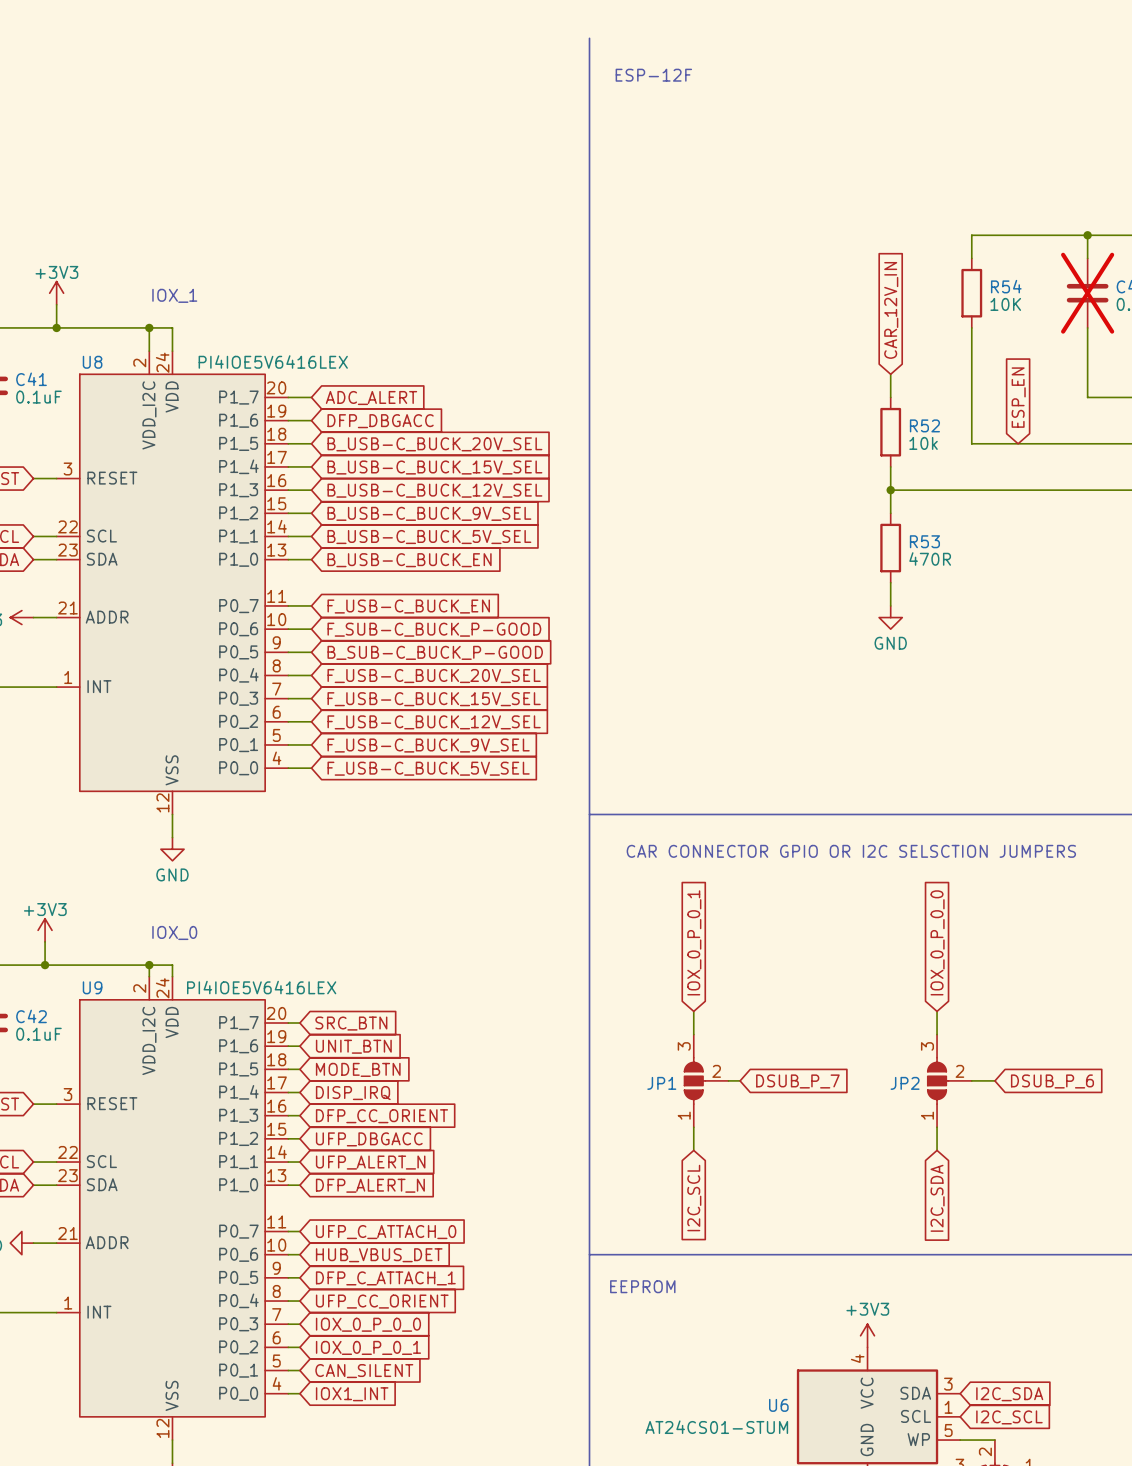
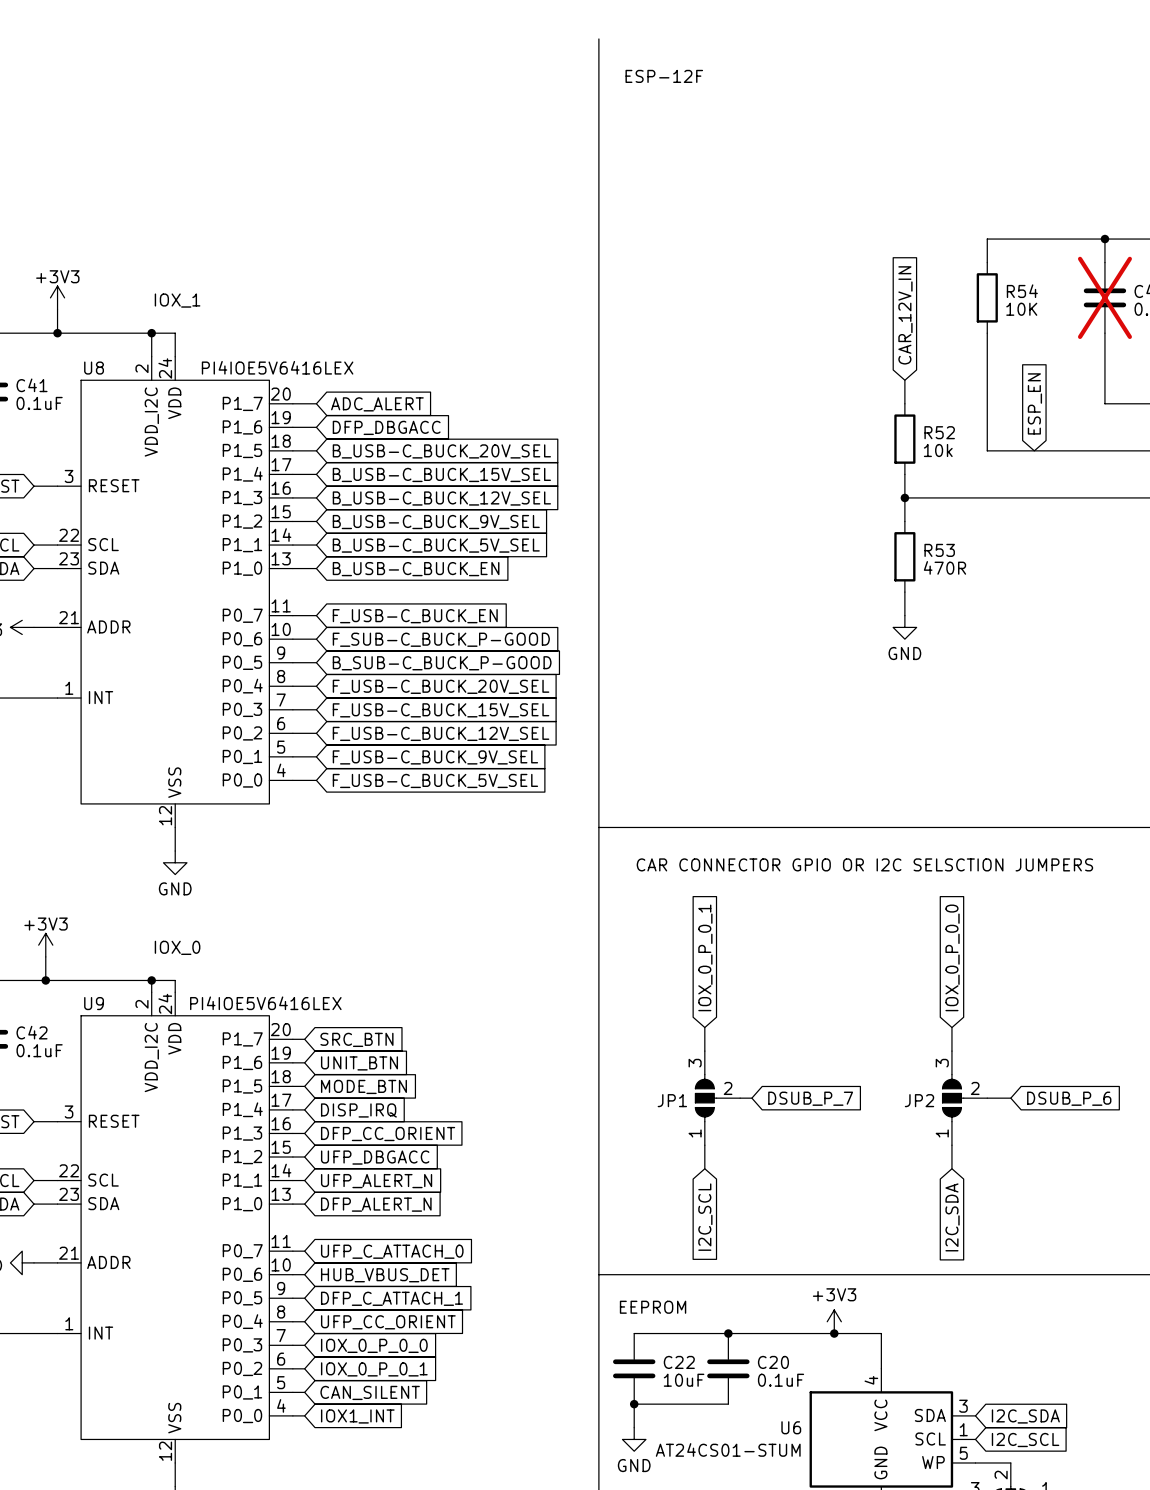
wire: none -> (634, 1333) (881, 1333) (881, 1368)
junction: none -> (728, 1333)
junction: none -> (834, 1333)
power symbol position: +3V3 (867, 1335) -> +3V3 (834, 1321)
C22: none -> 10uF (634, 1368)
C20: none -> 0.1uF (728, 1368)
junction: none -> (634, 1404)
wire: none -> (728, 1404) (634, 1404) (634, 1427)
power symbol: none -> GND (634, 1439)

